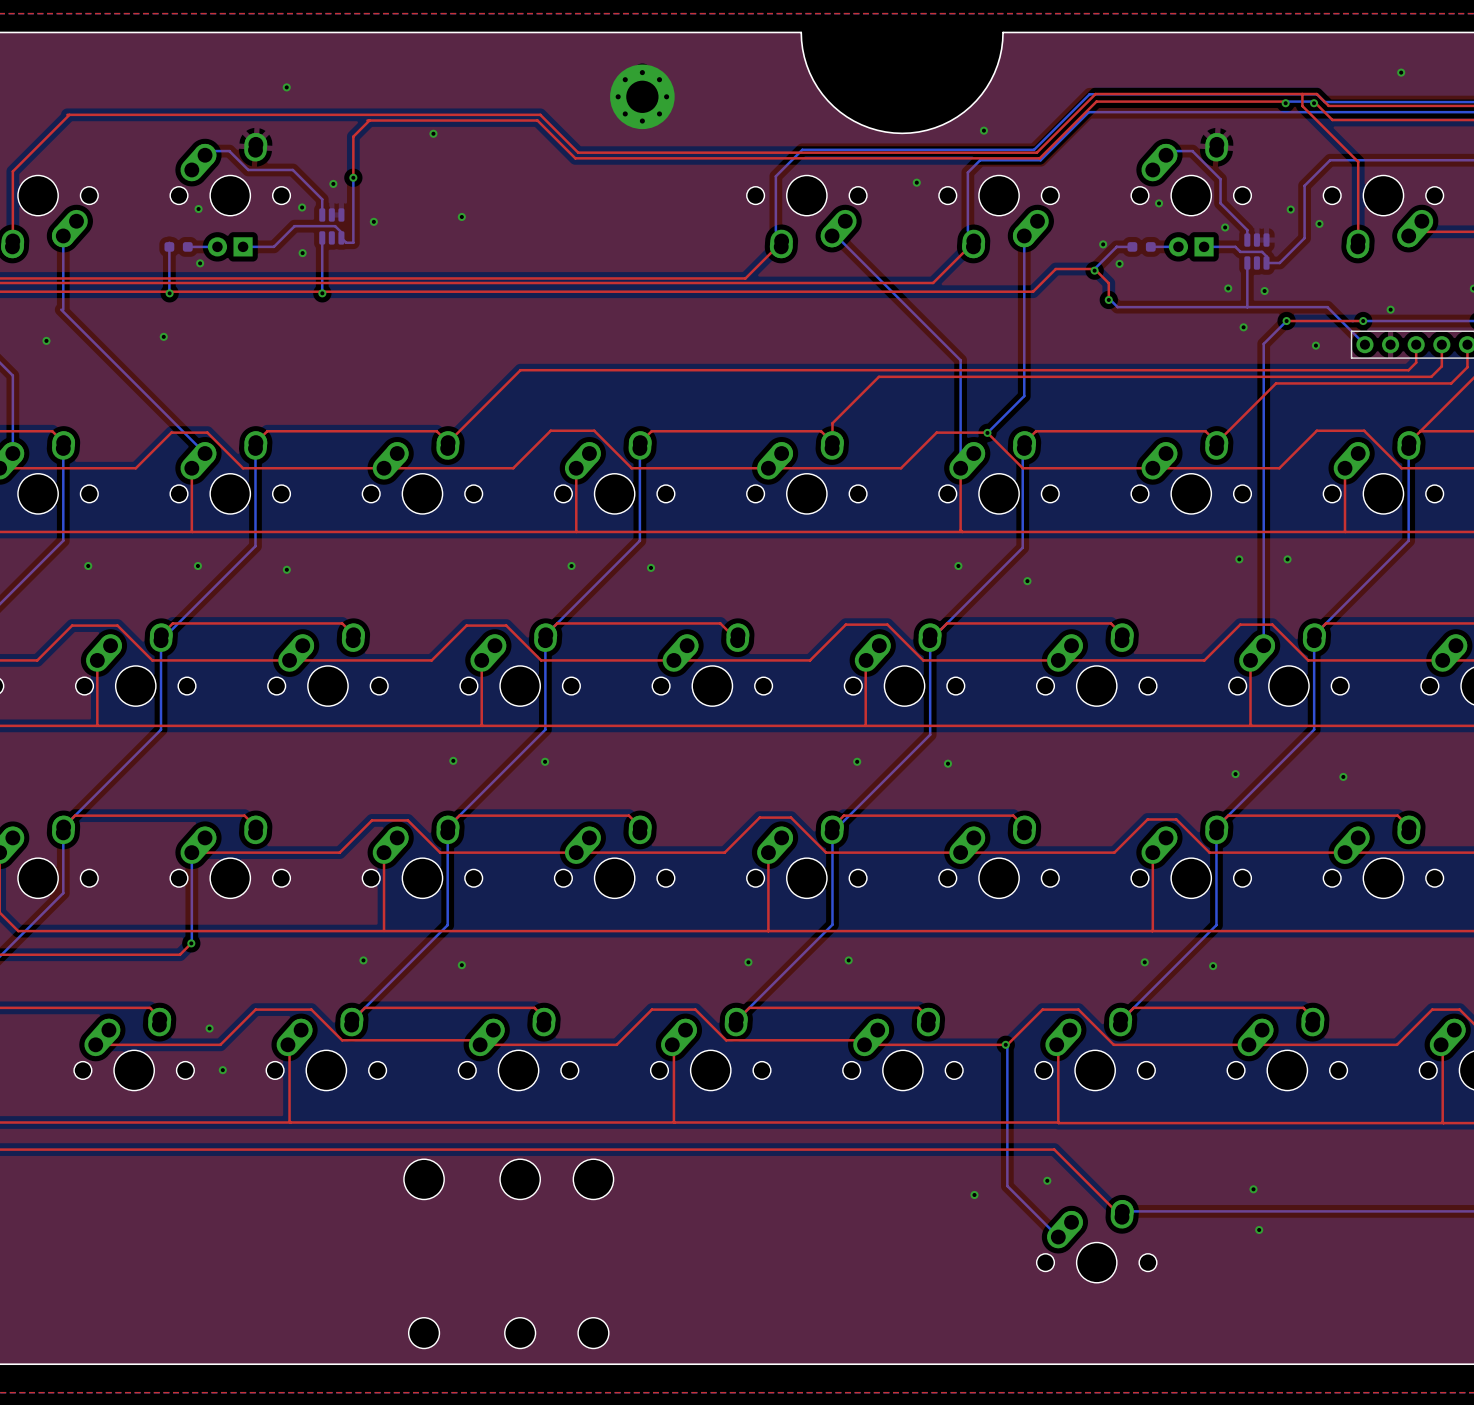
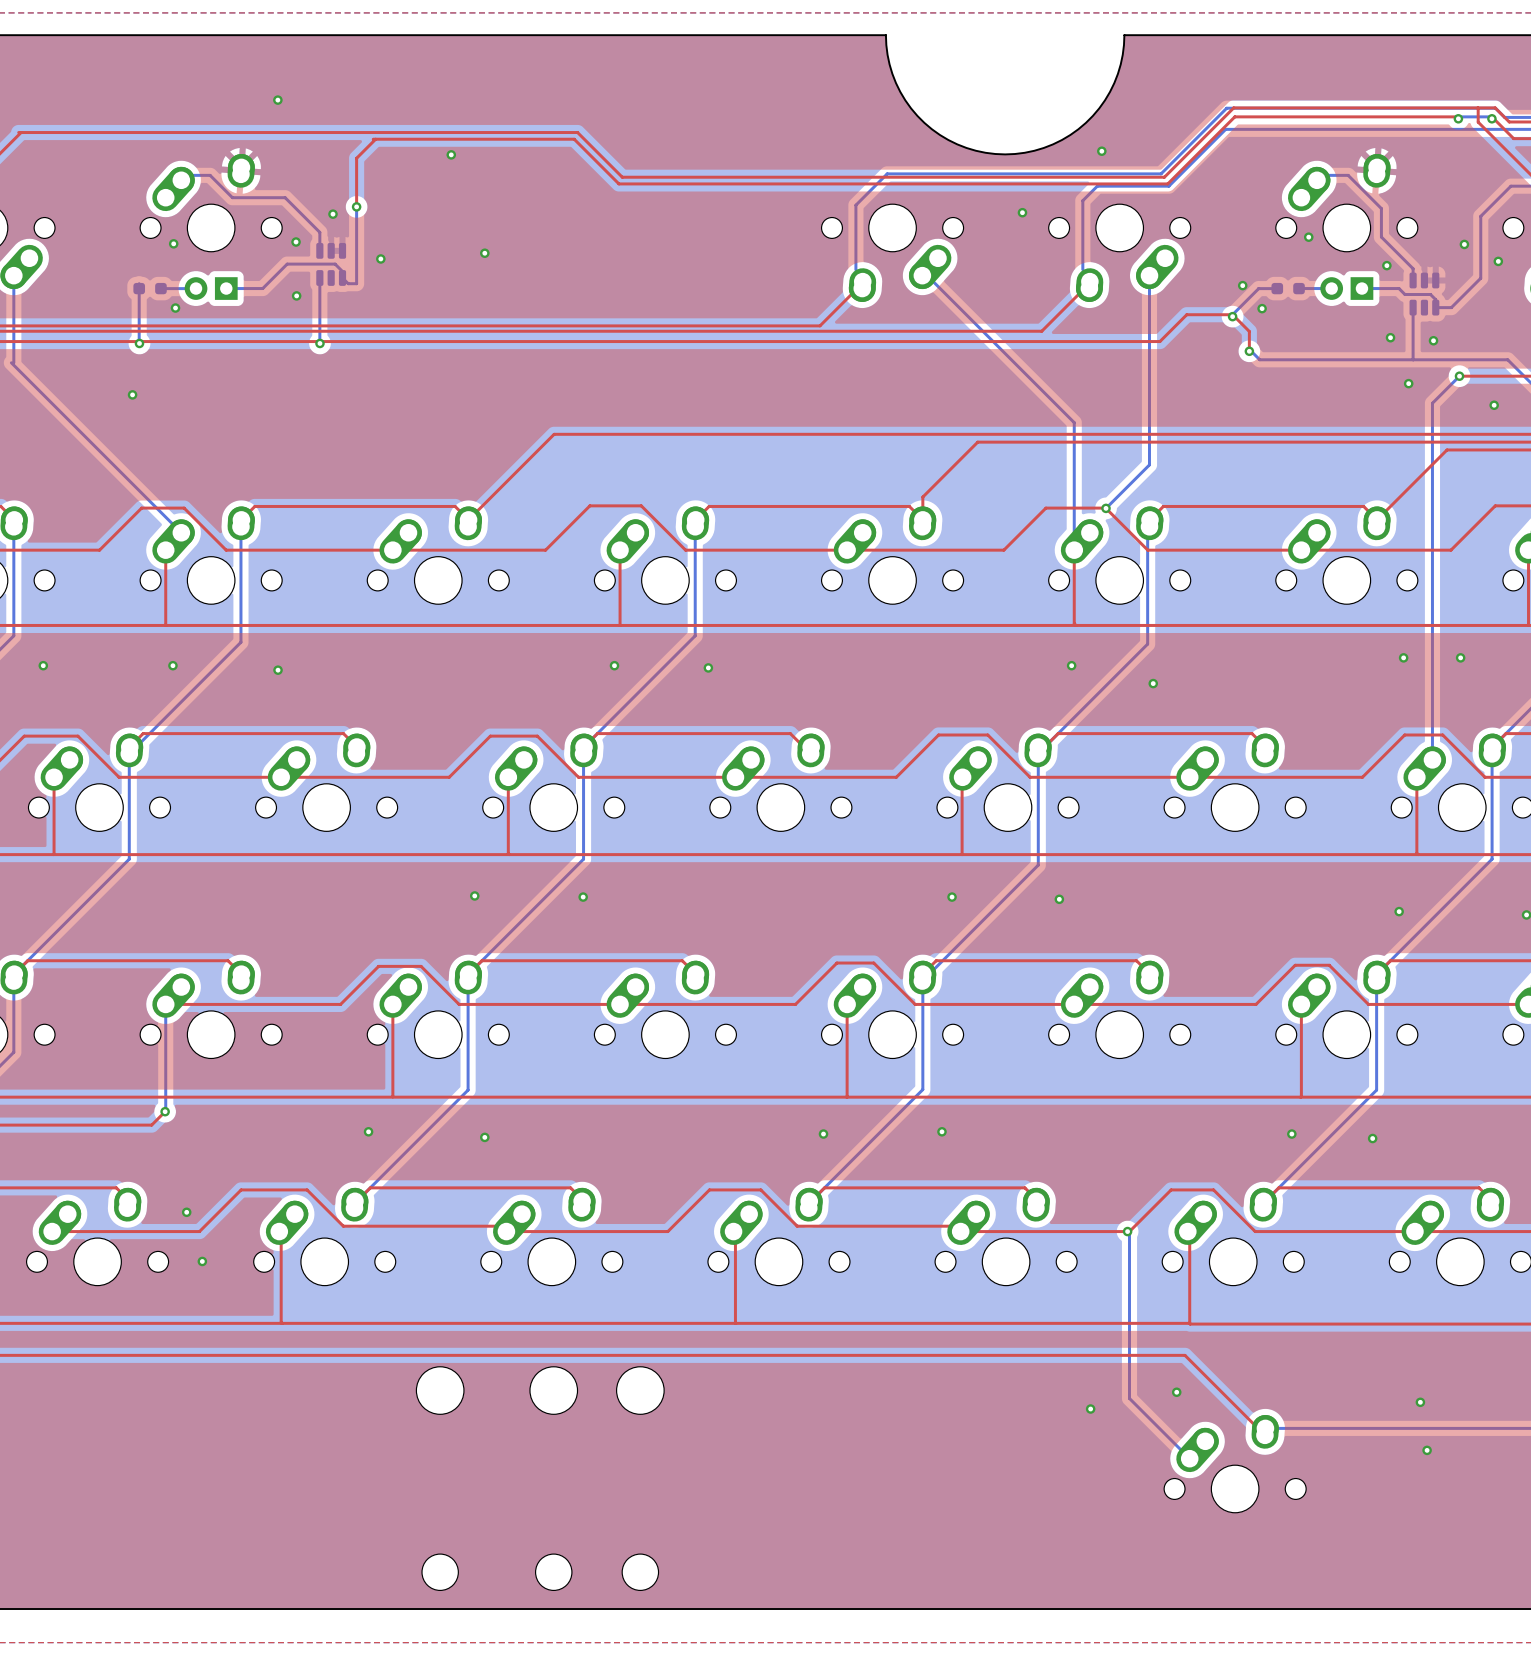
part: (642, 96) -> none

